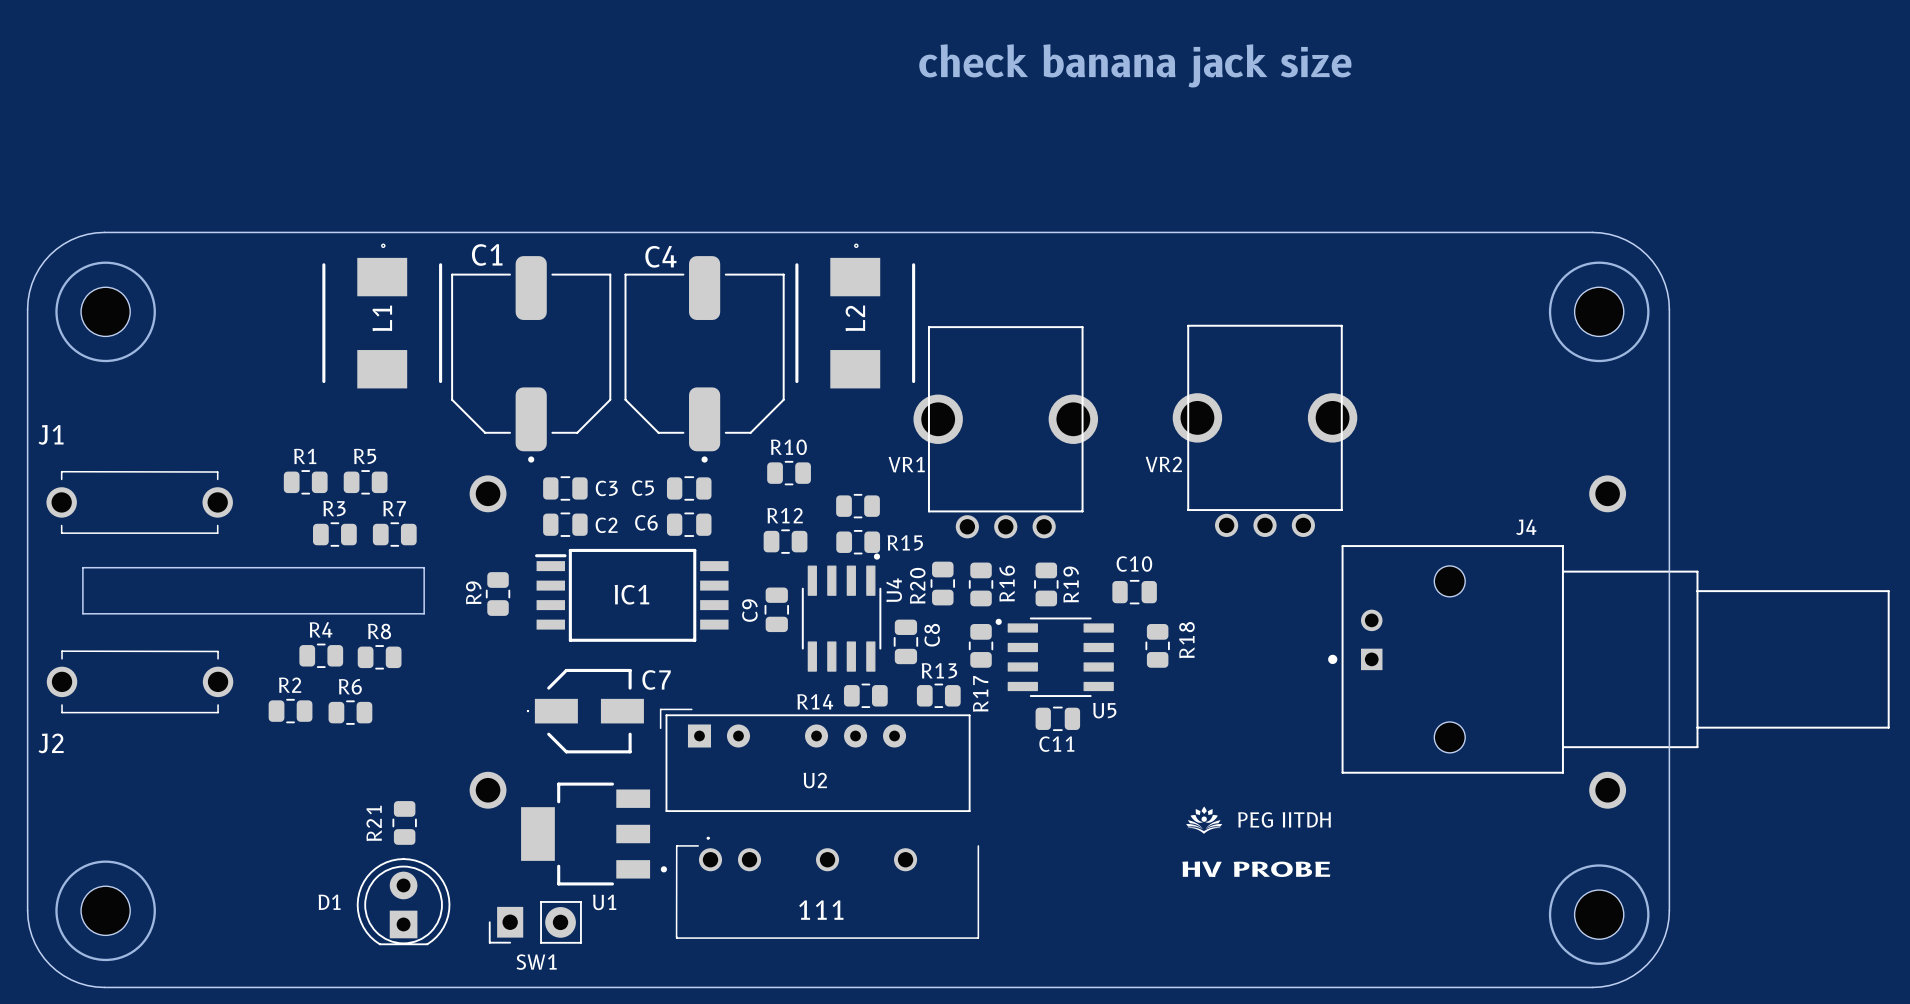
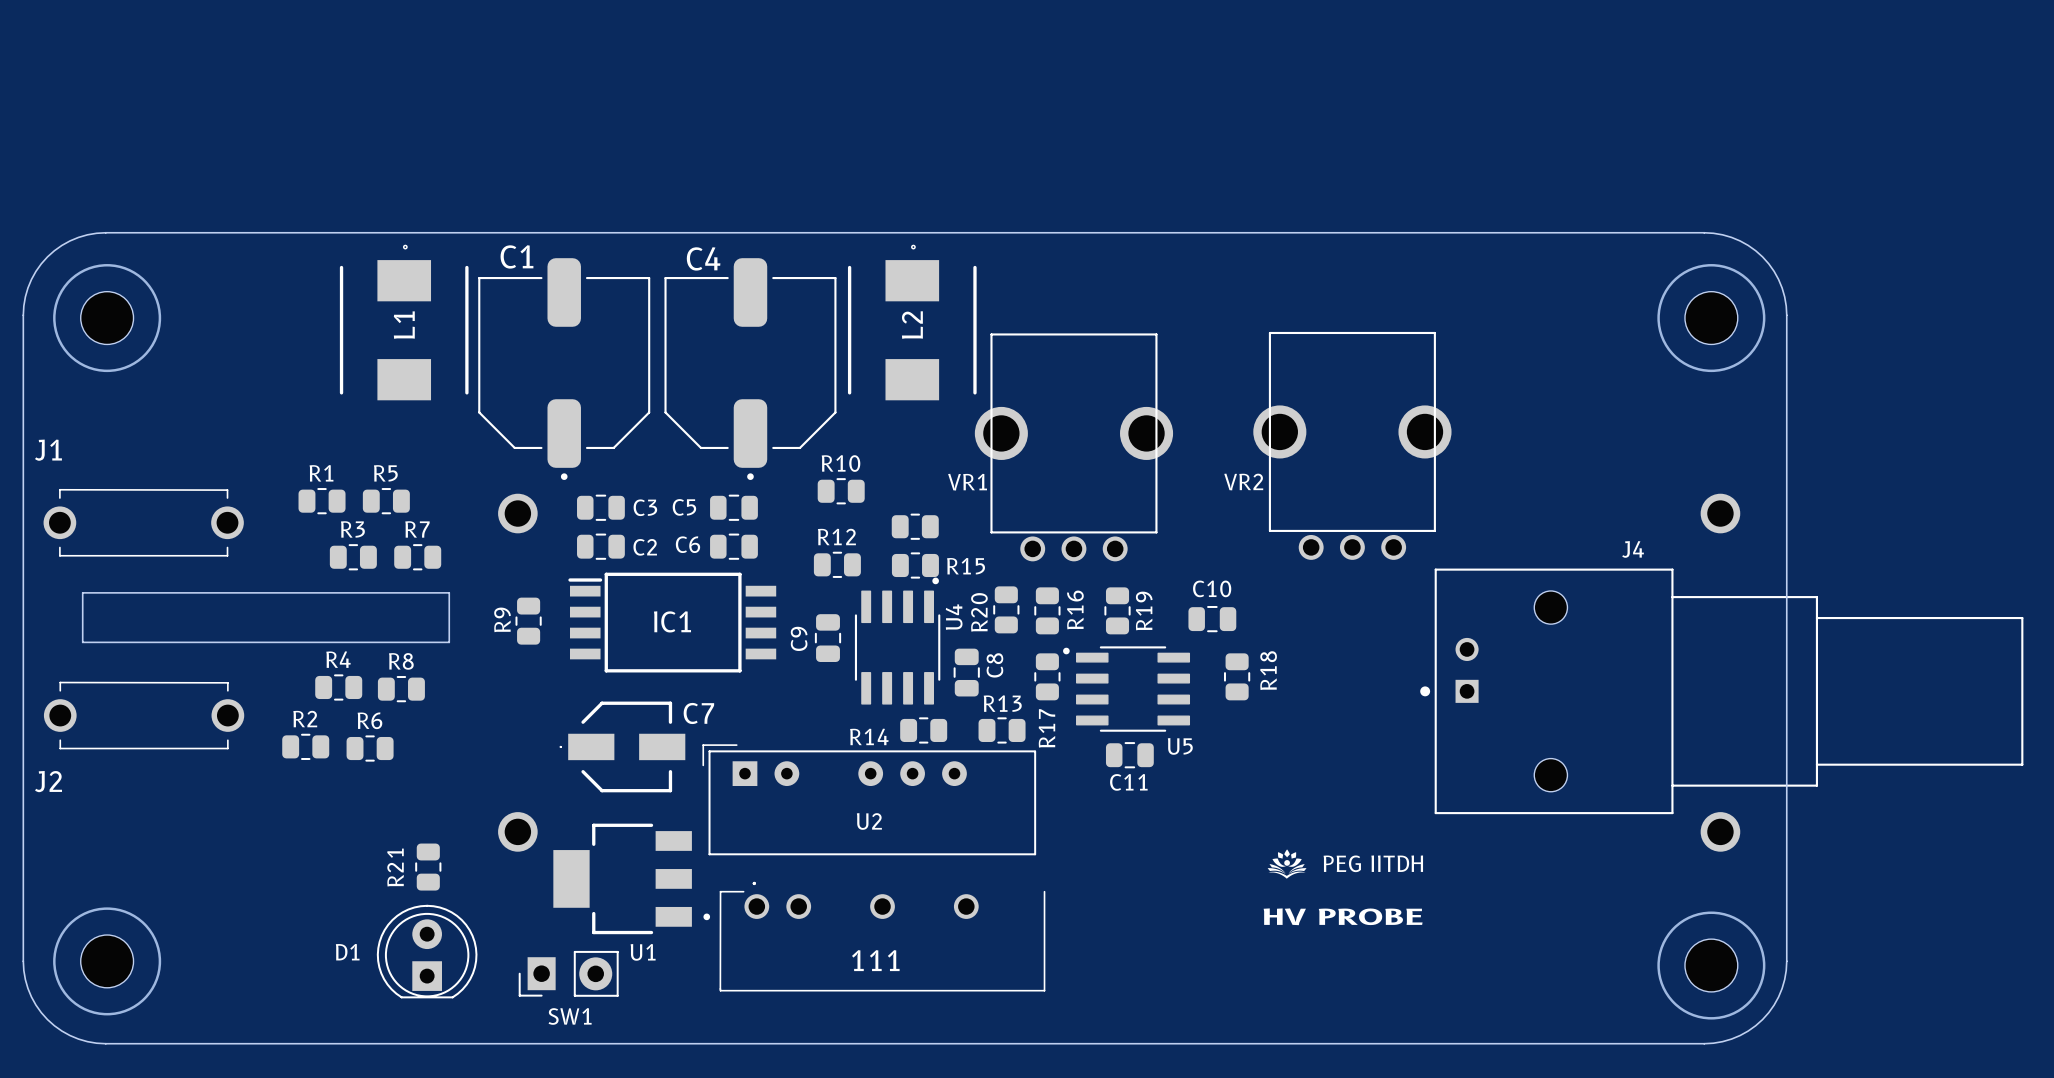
text: check banana jack size (1135, 65) -> none

